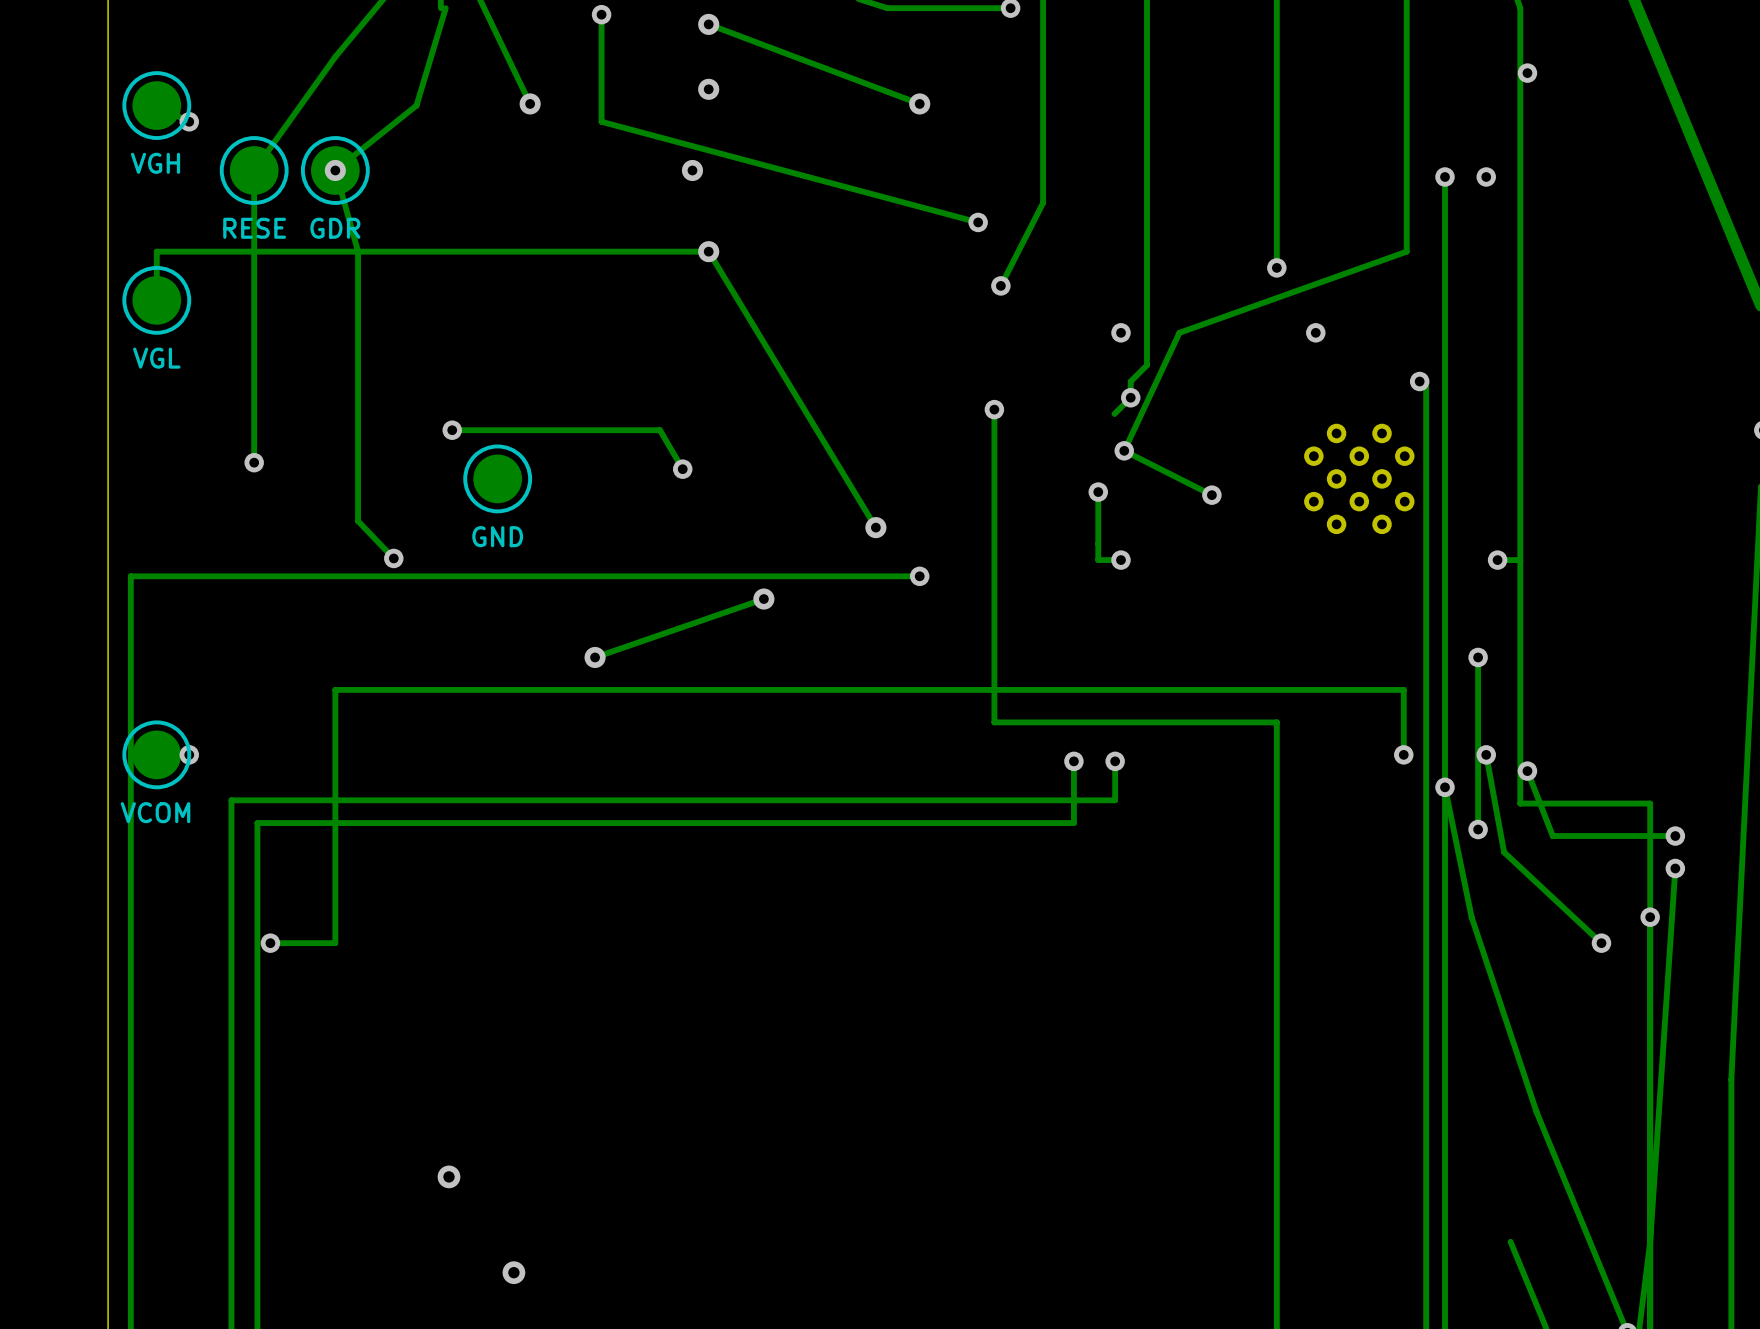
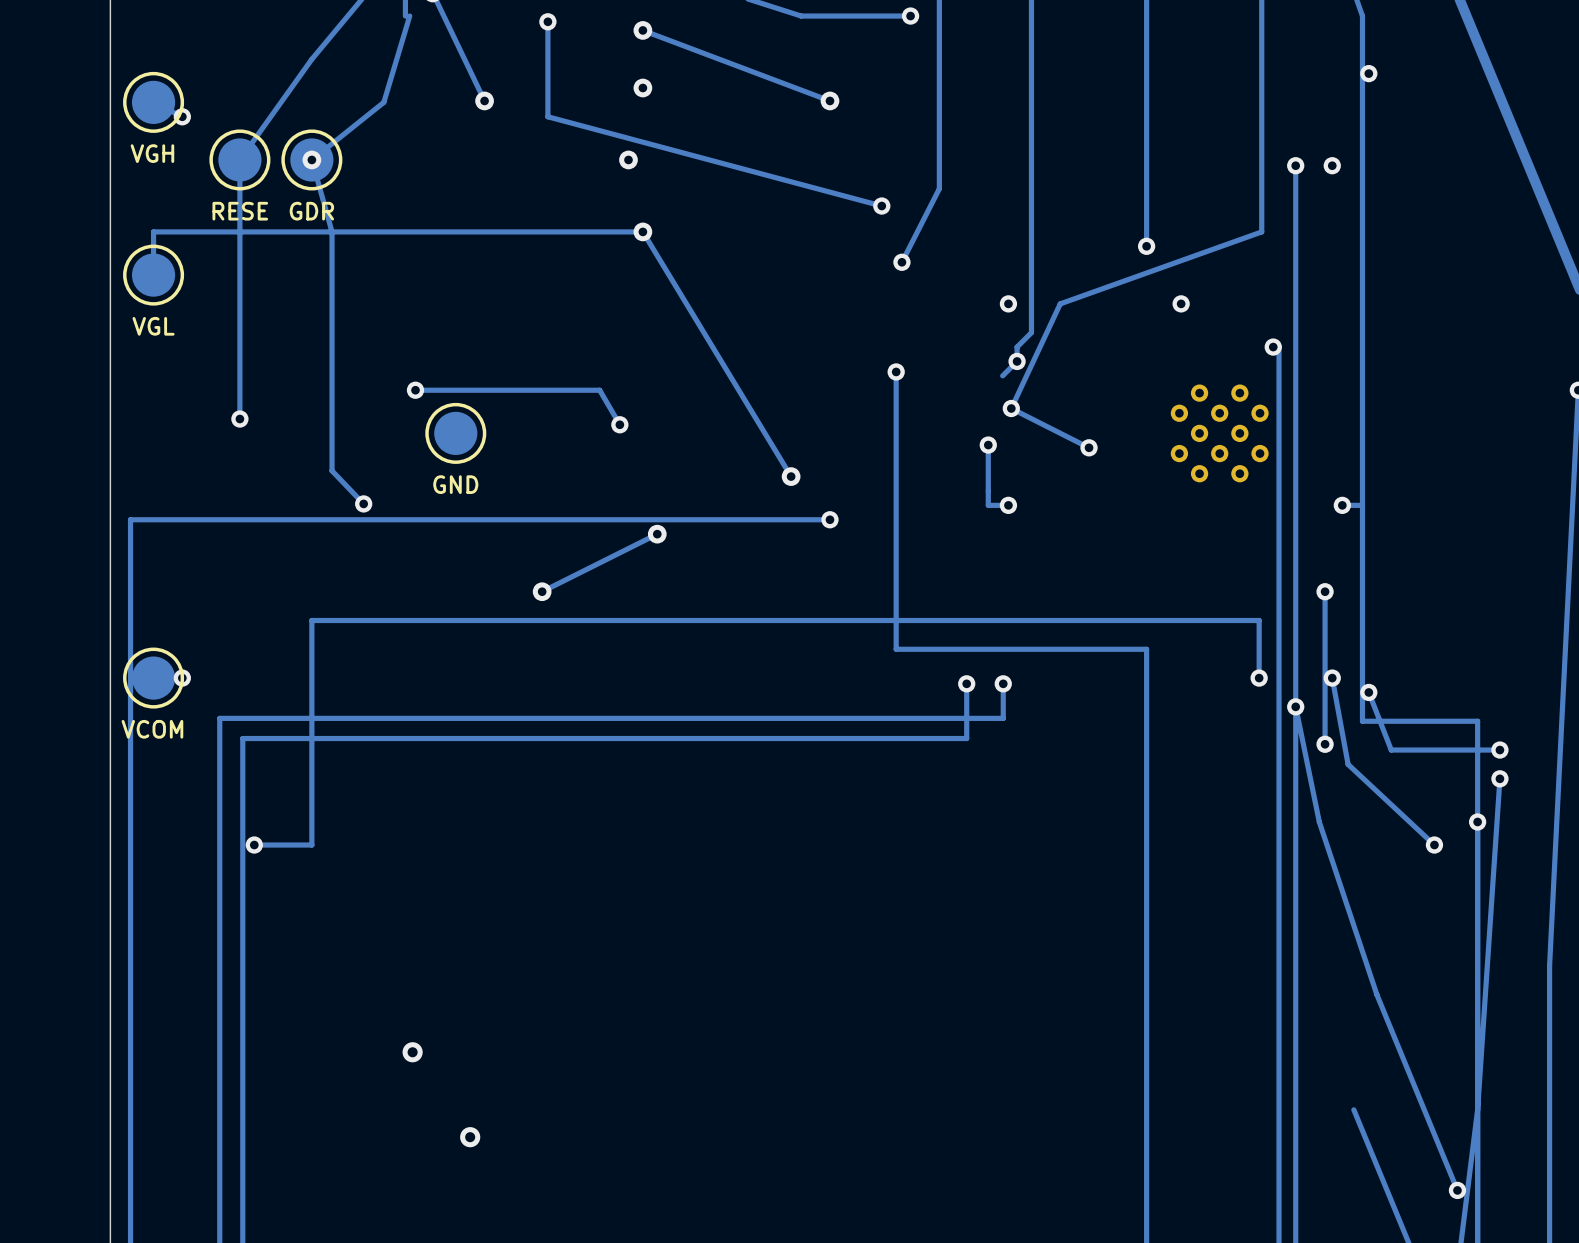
track: (763, 599) (595, 657) -> (657, 534) (542, 591)
via position: (763, 599) -> (657, 534)

